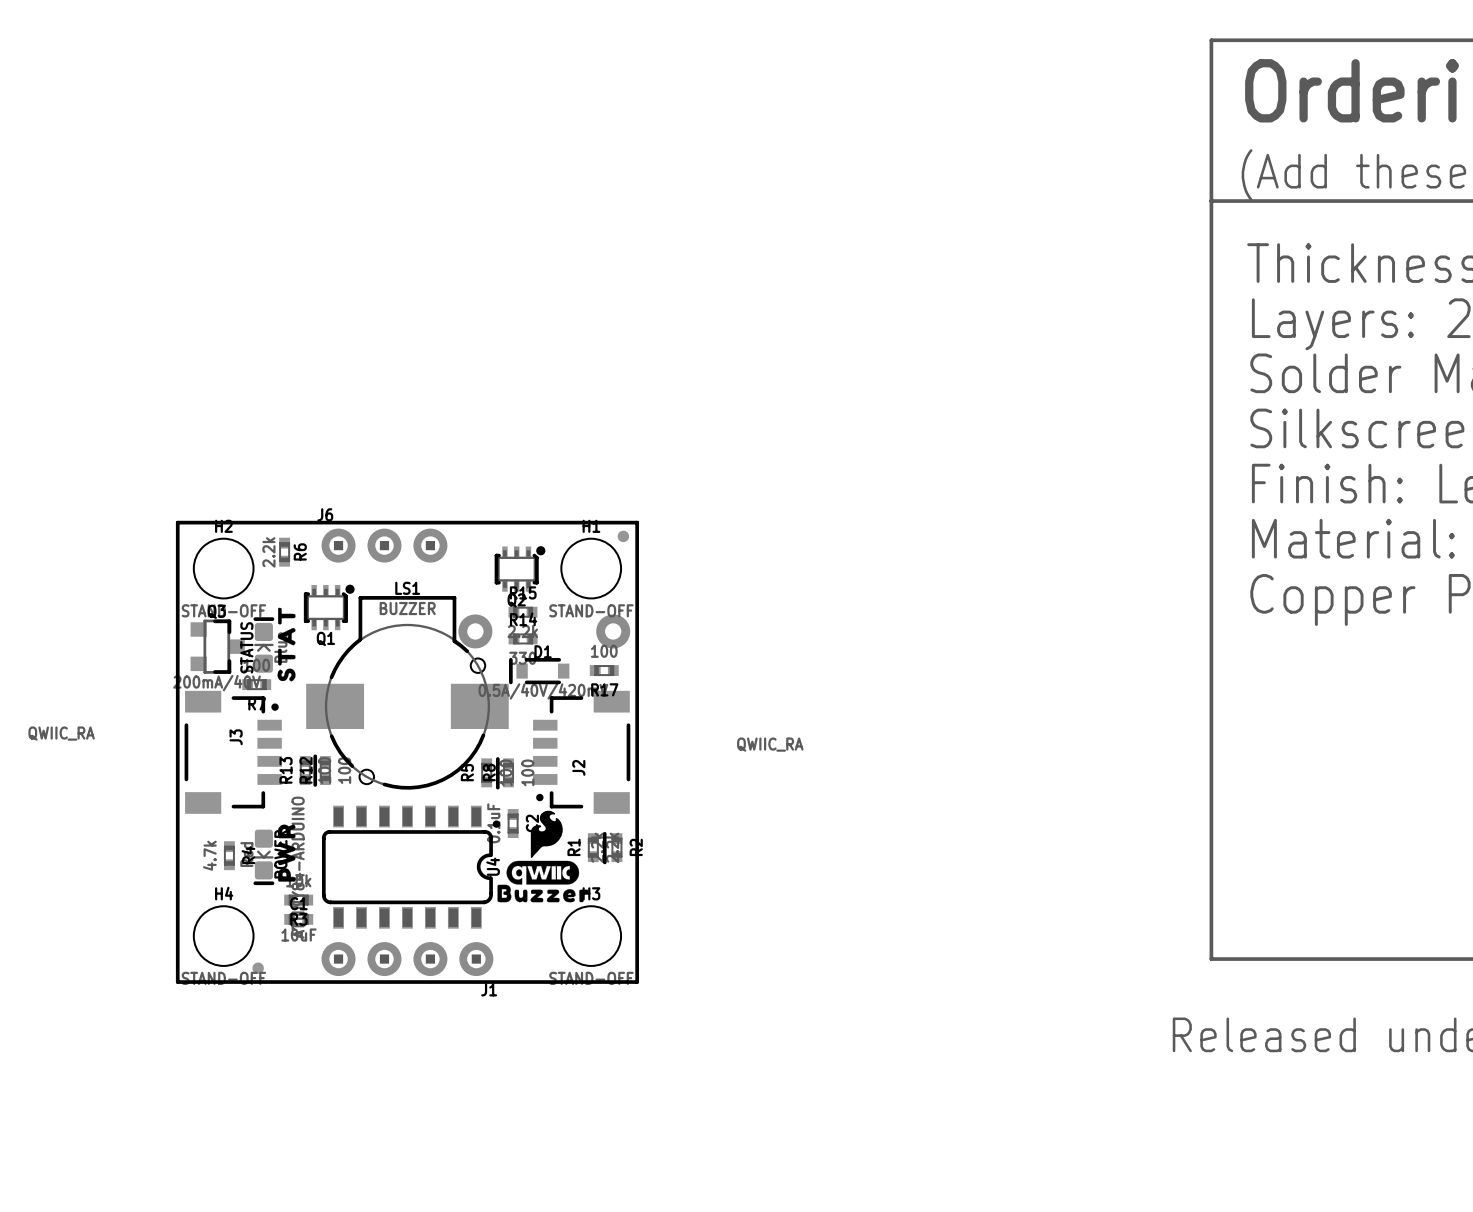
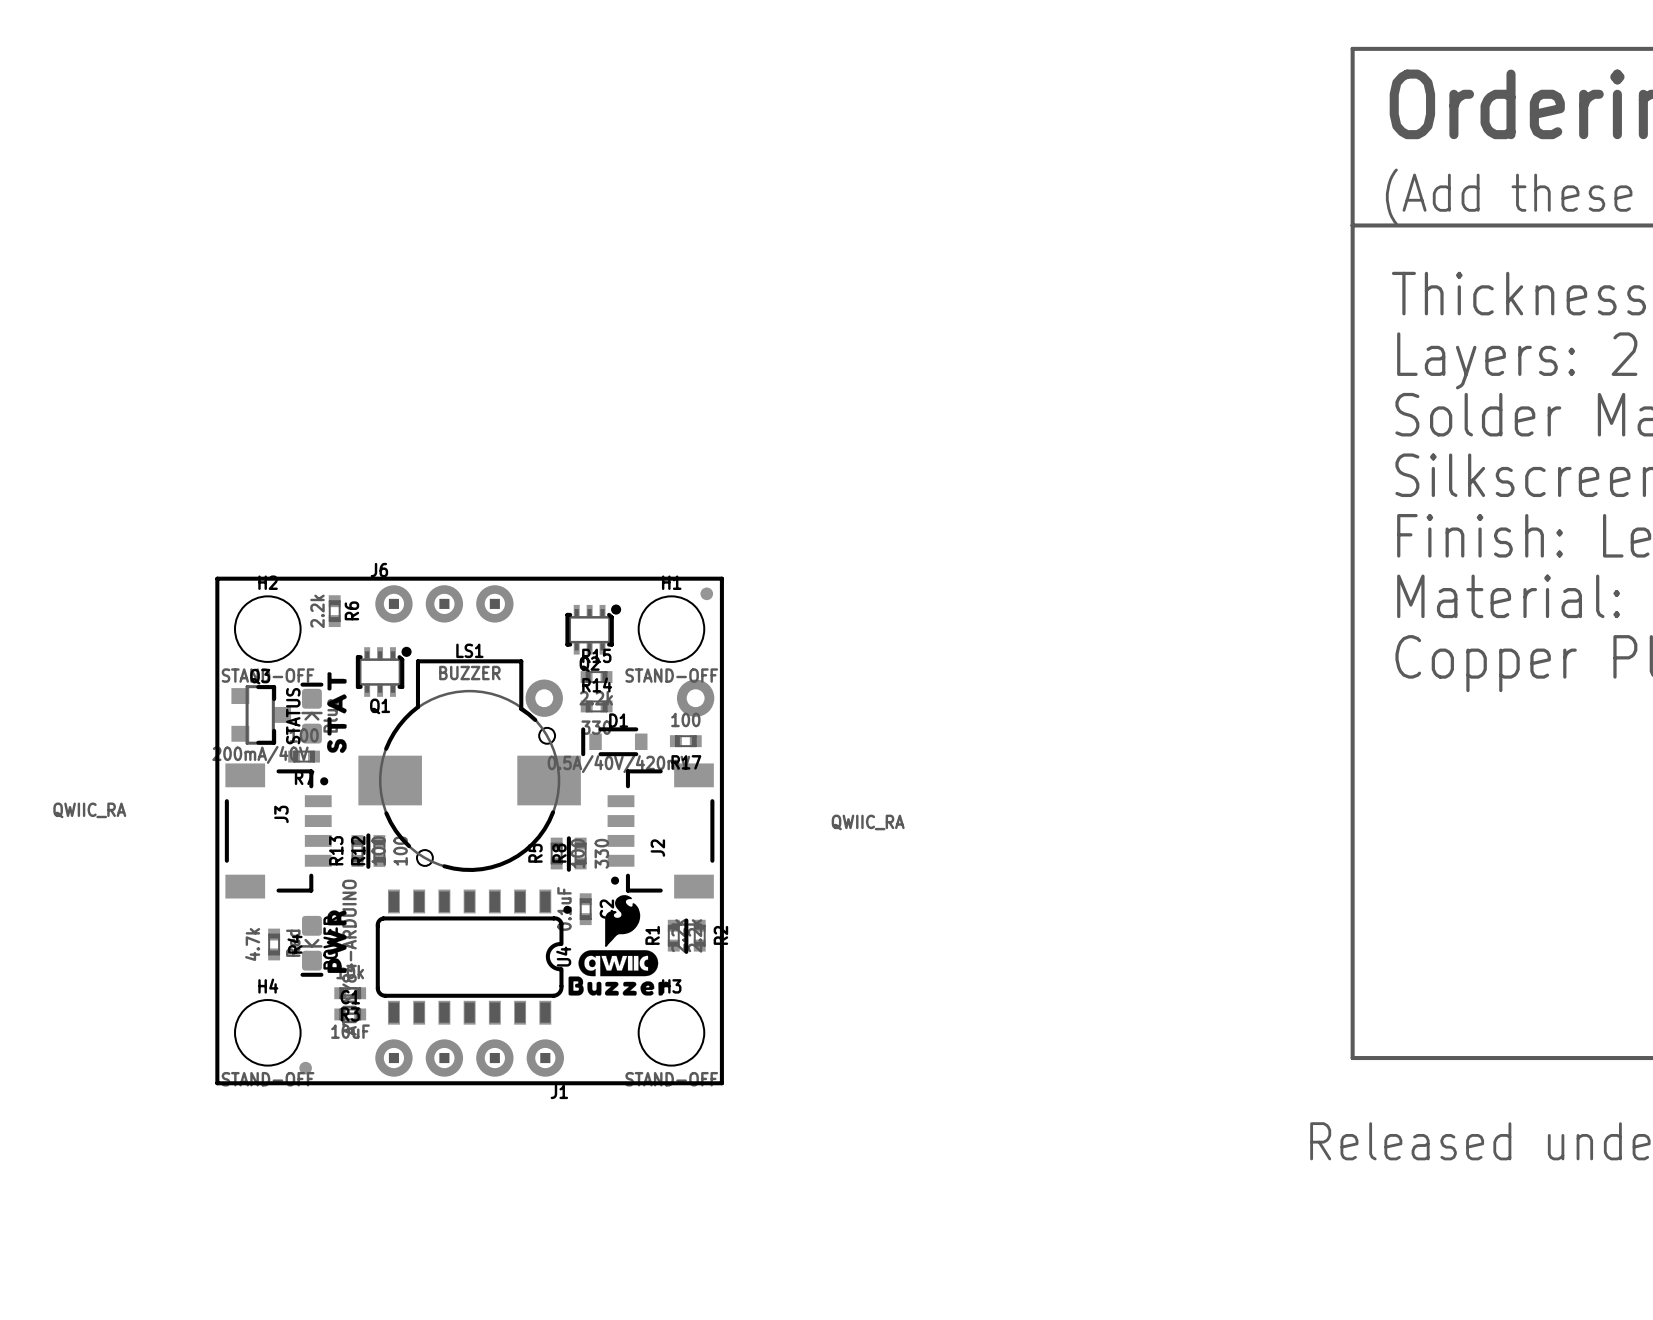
R8 value: 100 (527, 772) -> 330 (601, 853)

